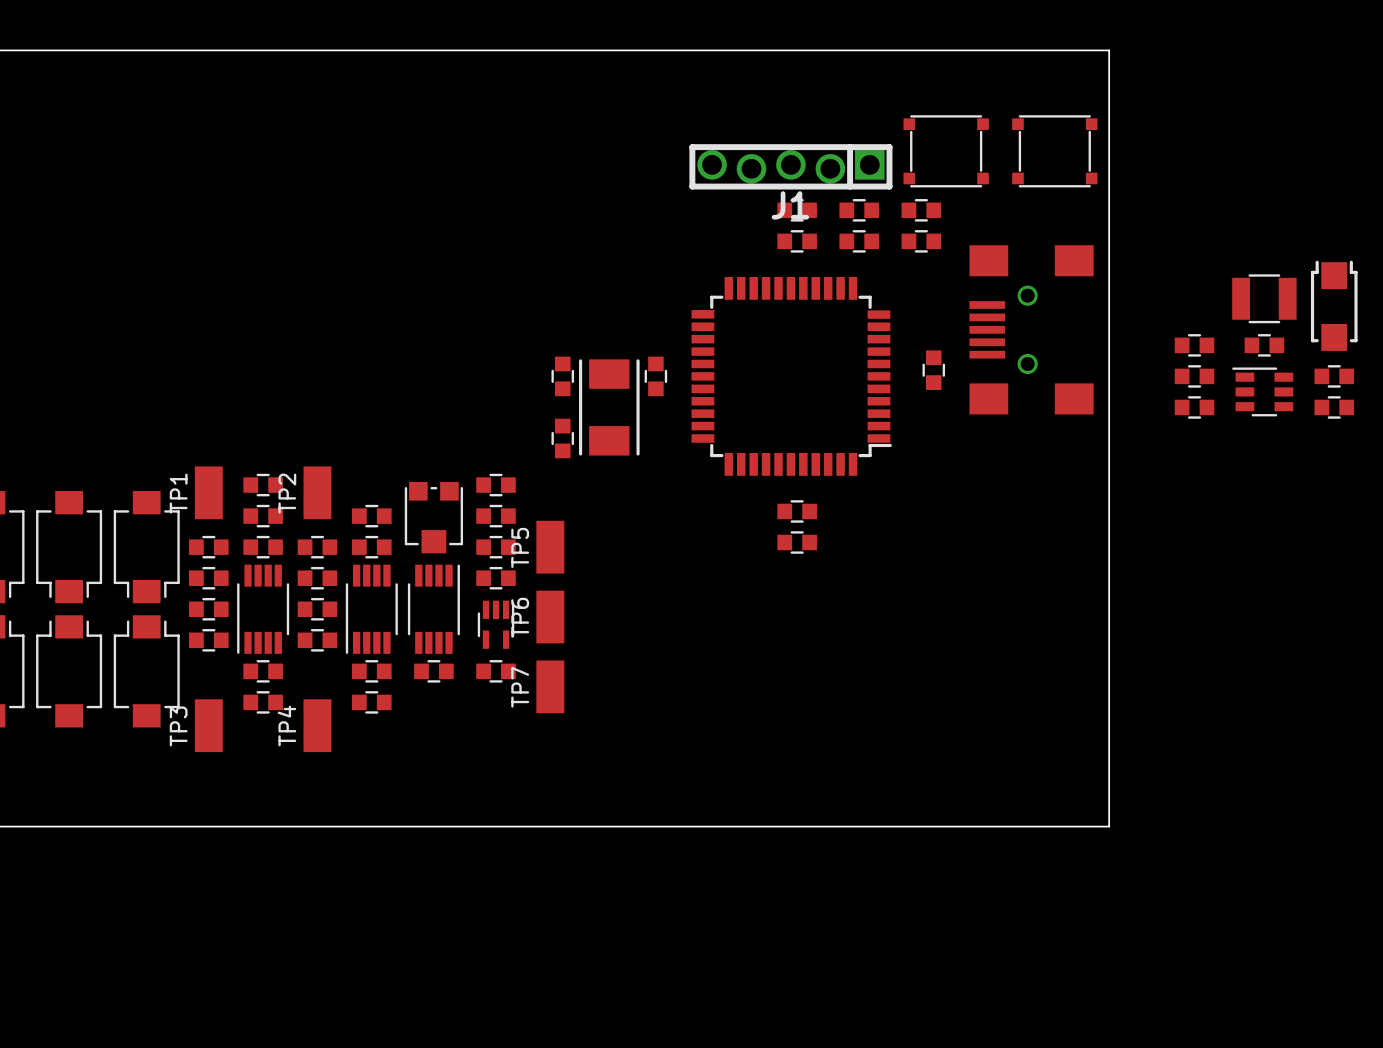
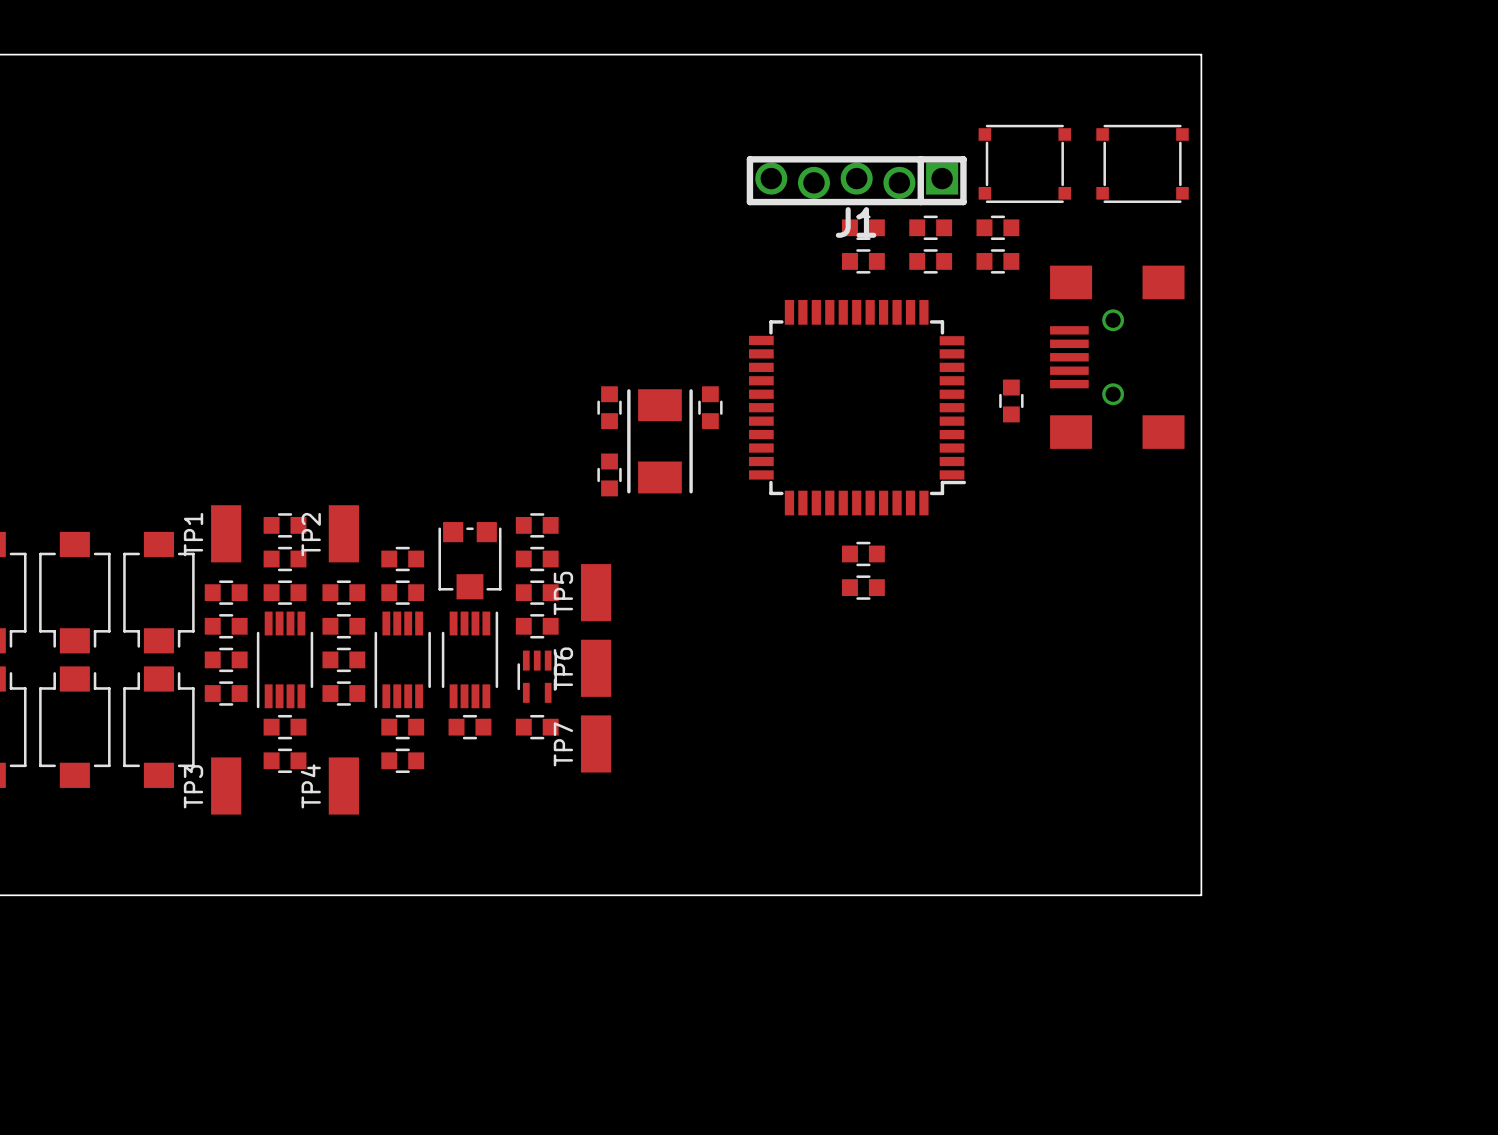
part: (1264, 298) -> none
part: (1334, 305) -> none
part: (1194, 345) -> none
part: (1264, 345) -> none
part: (1194, 376) -> none
part: (1334, 376) -> none
part: (1262, 391) -> none
part: (1194, 407) -> none
part: (1334, 407) -> none

